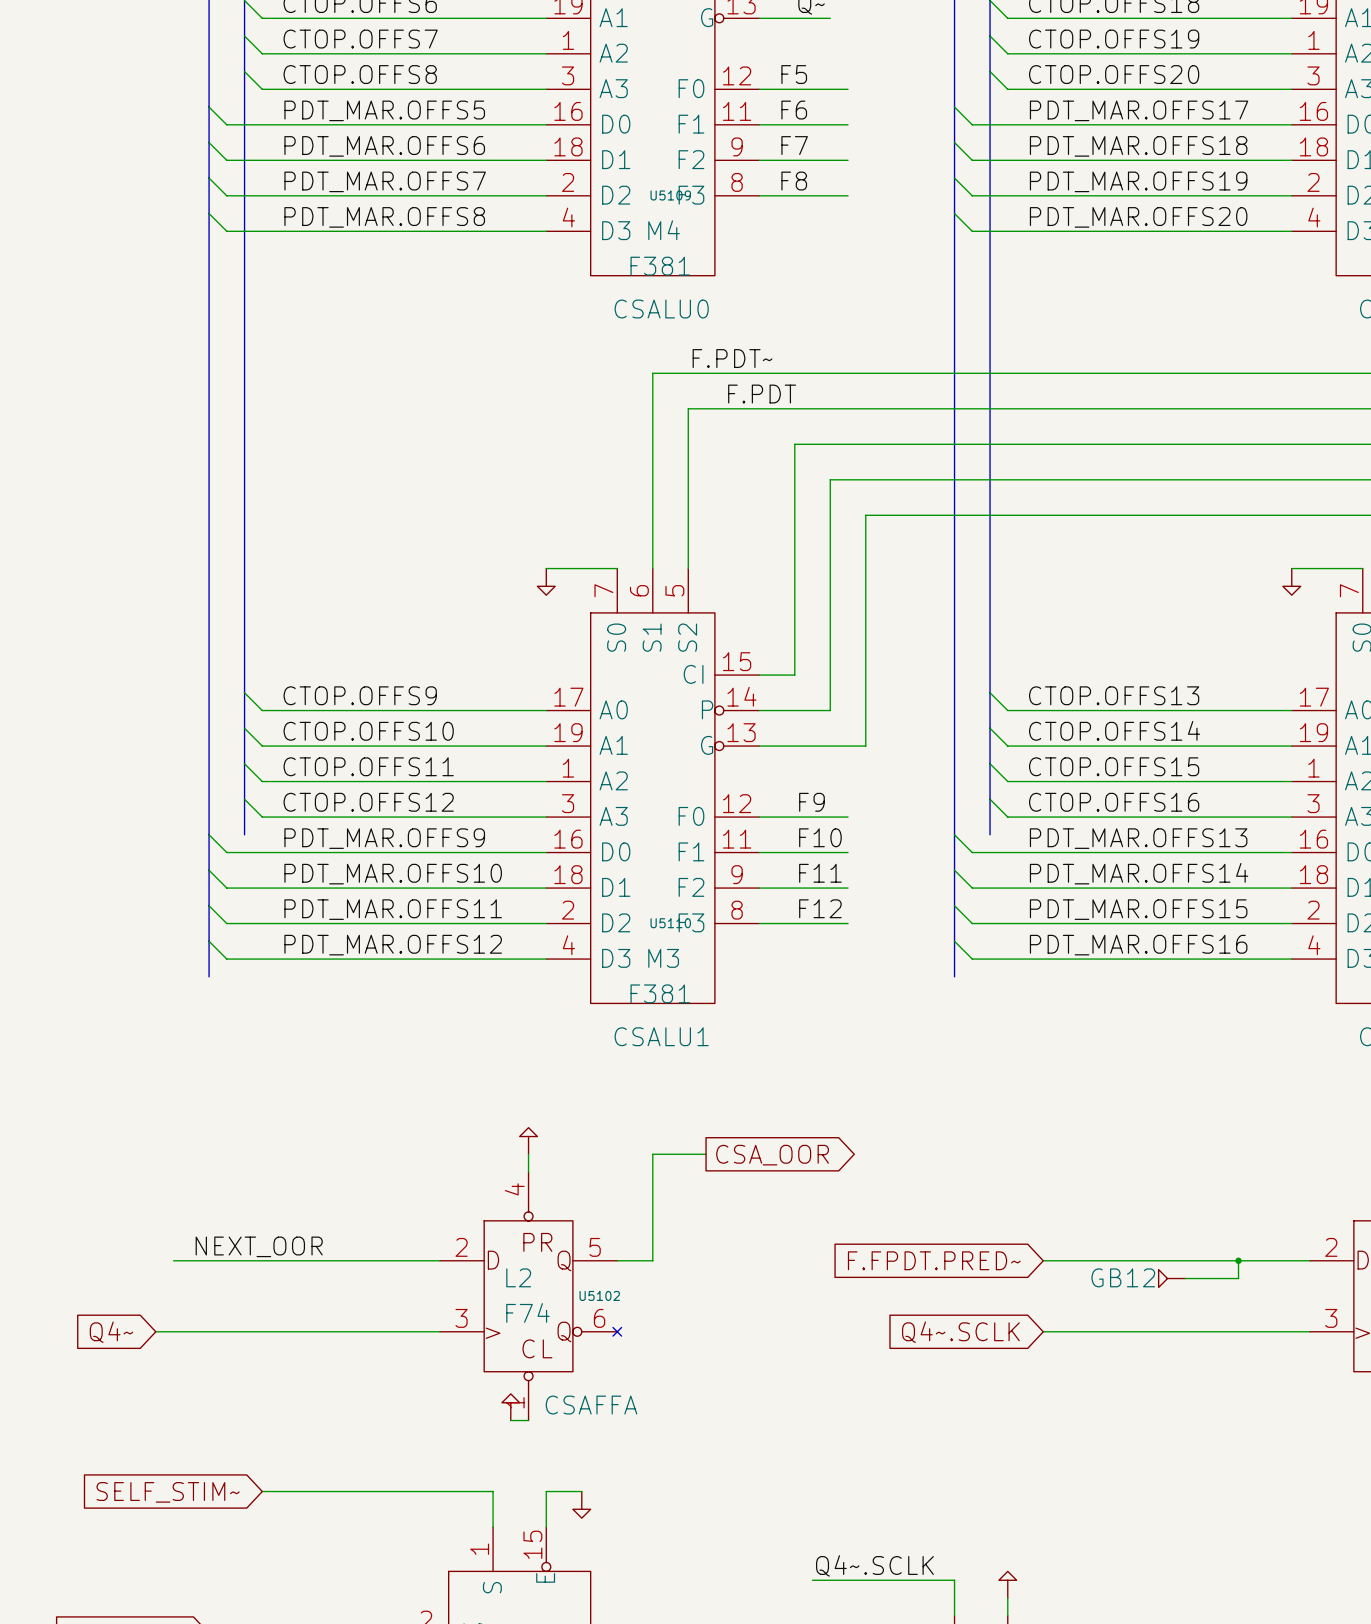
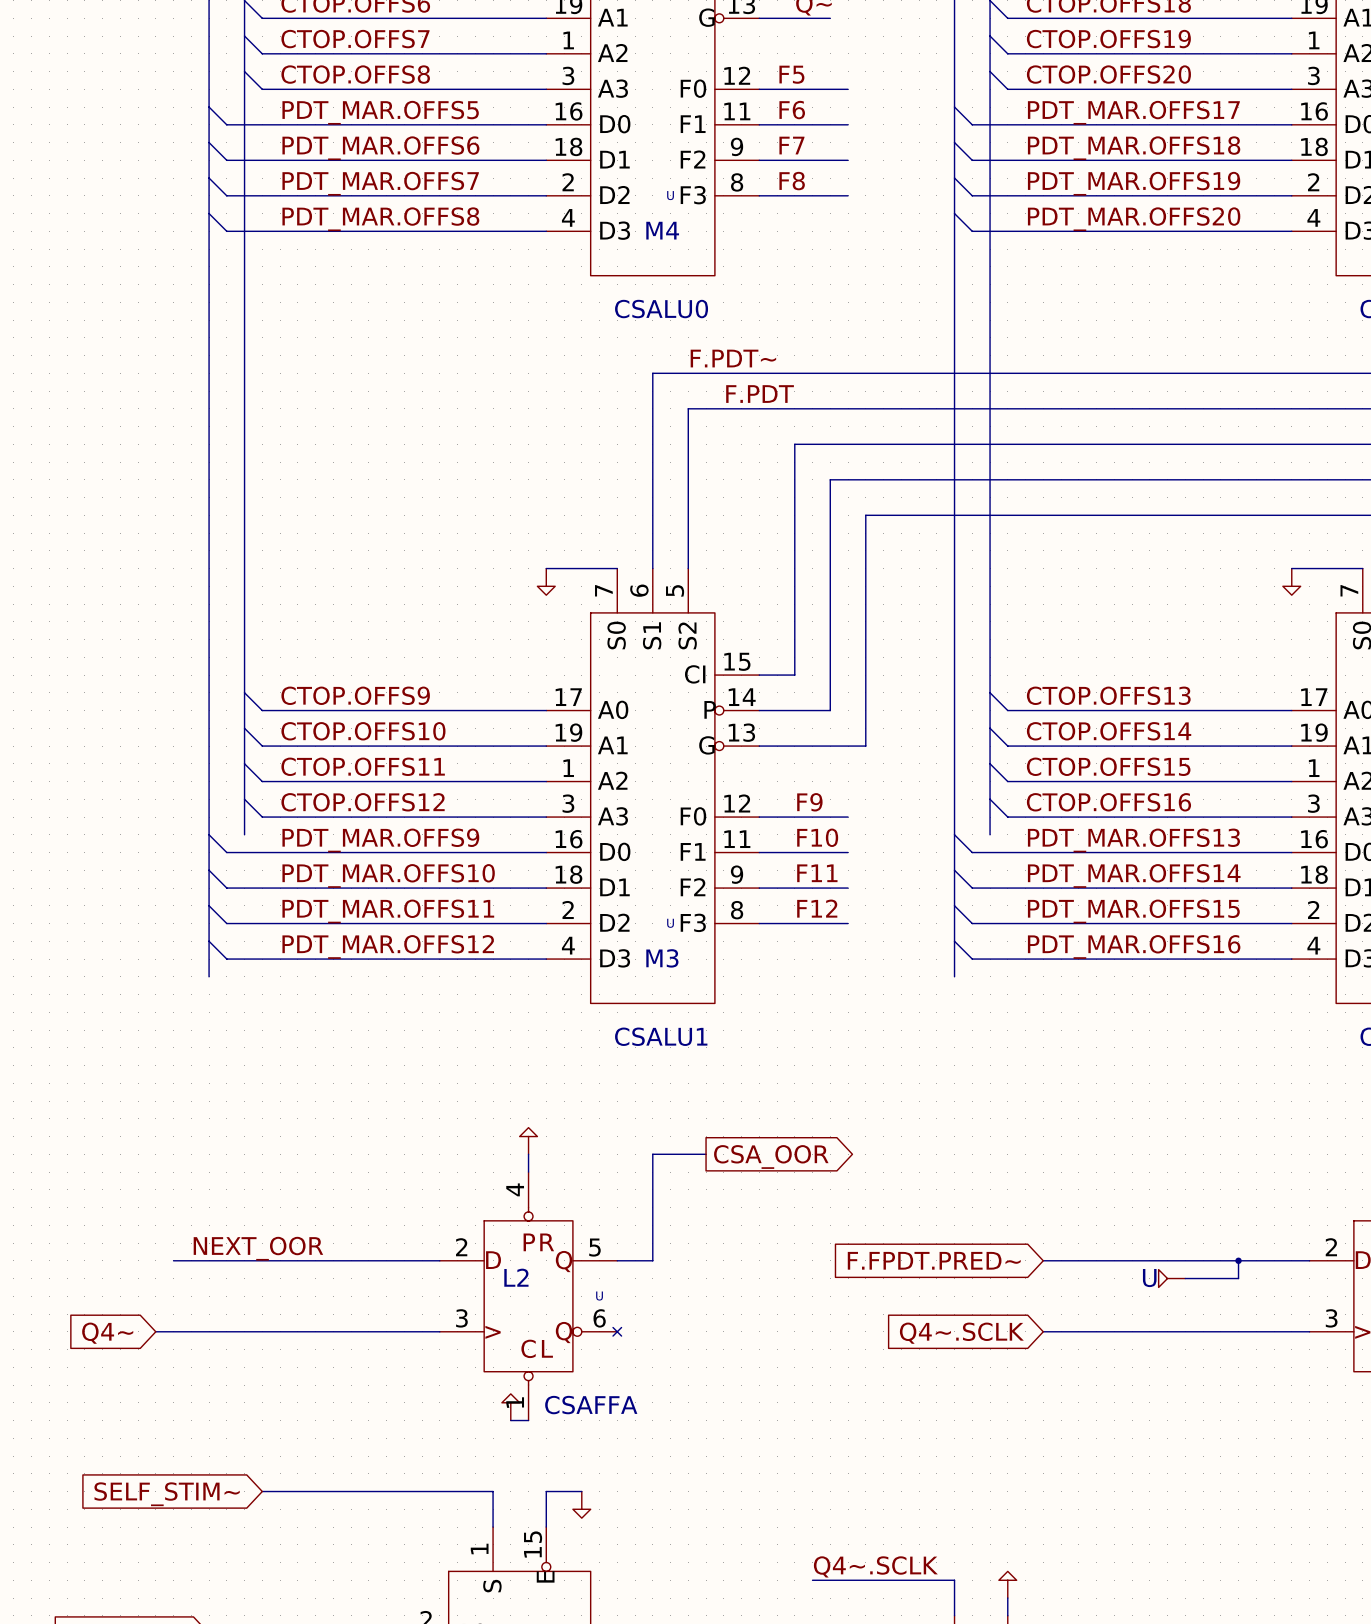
U5109 name: U5109 (670, 195) -> U (670, 195)
U5109 value: F381 (660, 266) -> none
U5110 name: U5110 (670, 923) -> U (670, 923)
U5110 value: F381 (660, 993) -> none
GB12 name: GB12 (1123, 1277) -> U (1149, 1278)
U5102 name: U5102 (599, 1295) -> U (599, 1296)
U5102 value: F74 (527, 1312) -> none

